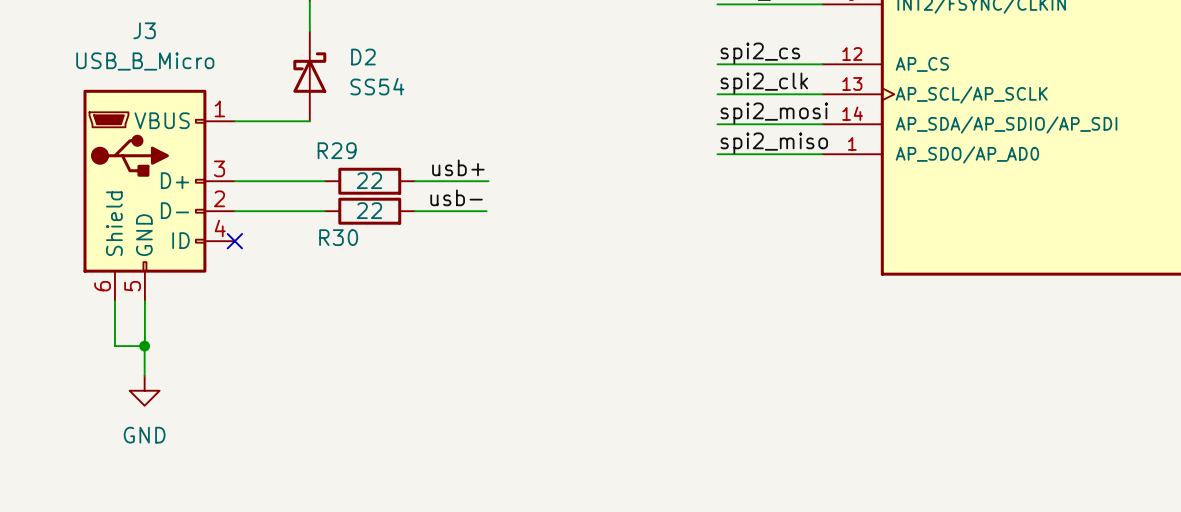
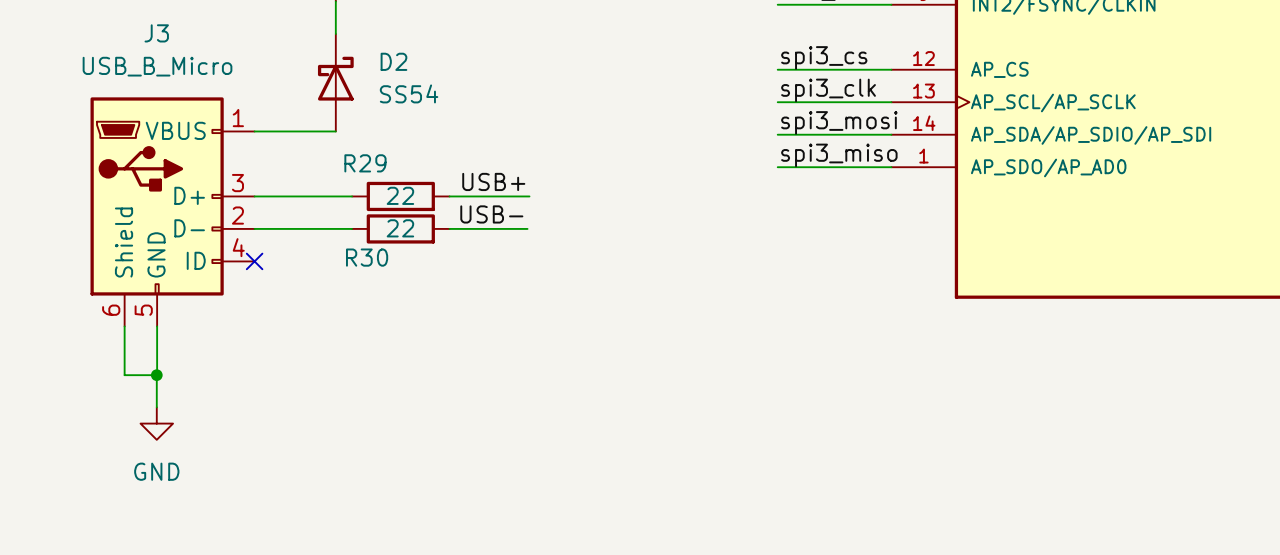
label: spi2_cs (760, 53) -> spi3_cs (824, 57)
label: spi2_clk (764, 83) -> spi3_clk (828, 90)
label: spi2_mosi (774, 113) -> spi3_mosi (839, 122)
label: spi2_miso (774, 143) -> spi3_miso (839, 155)
label: usb+ (458, 167) -> USB+ (493, 181)
label: usb- (456, 197) -> USB- (491, 214)

